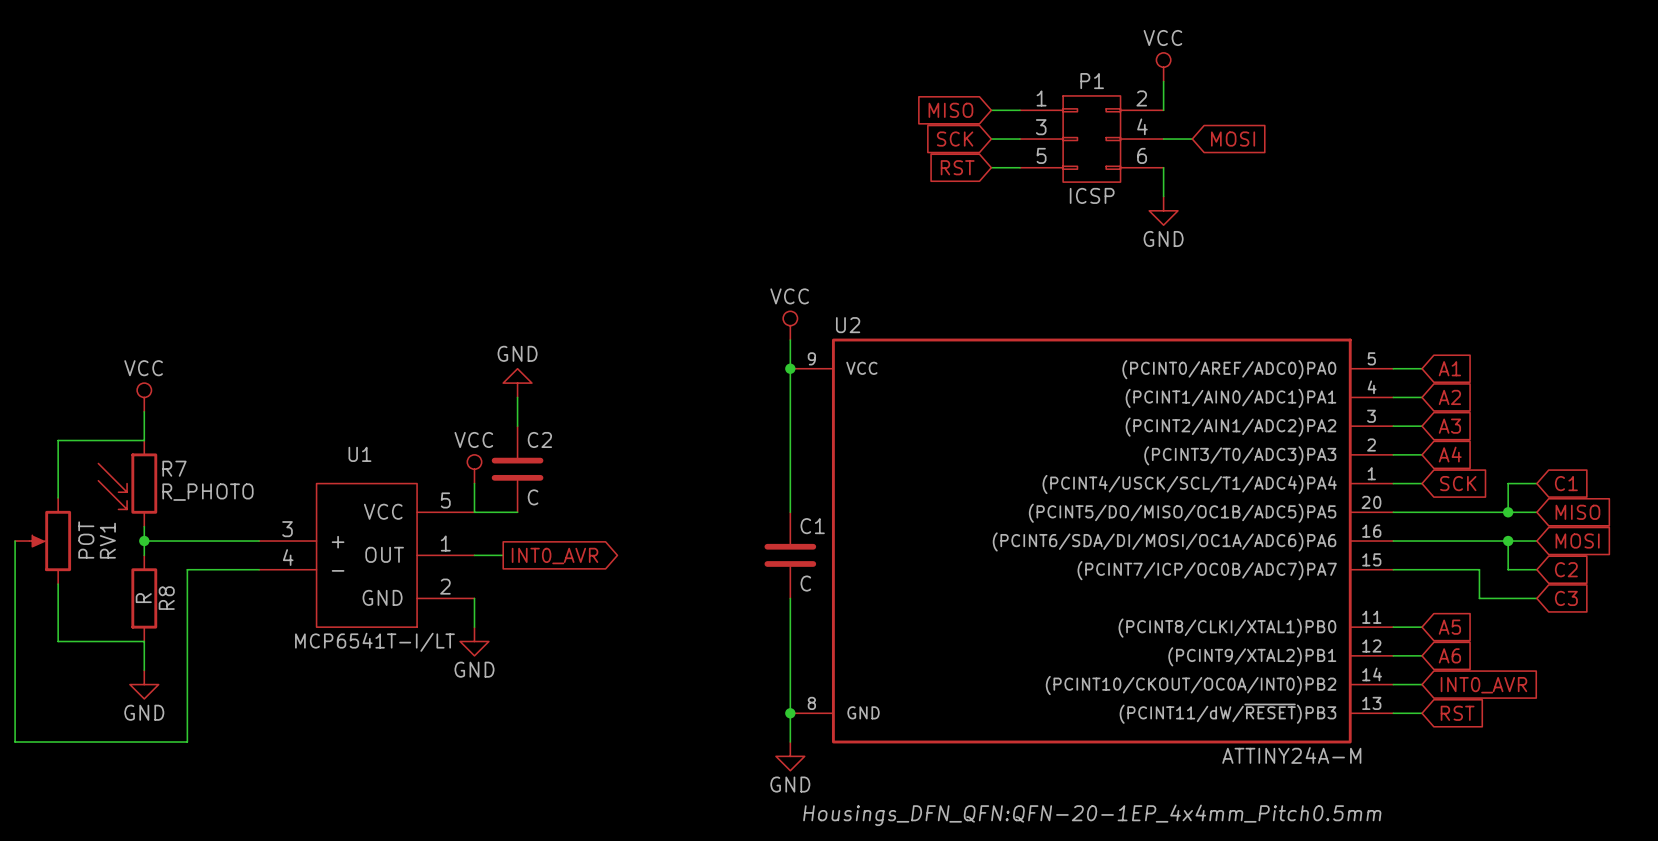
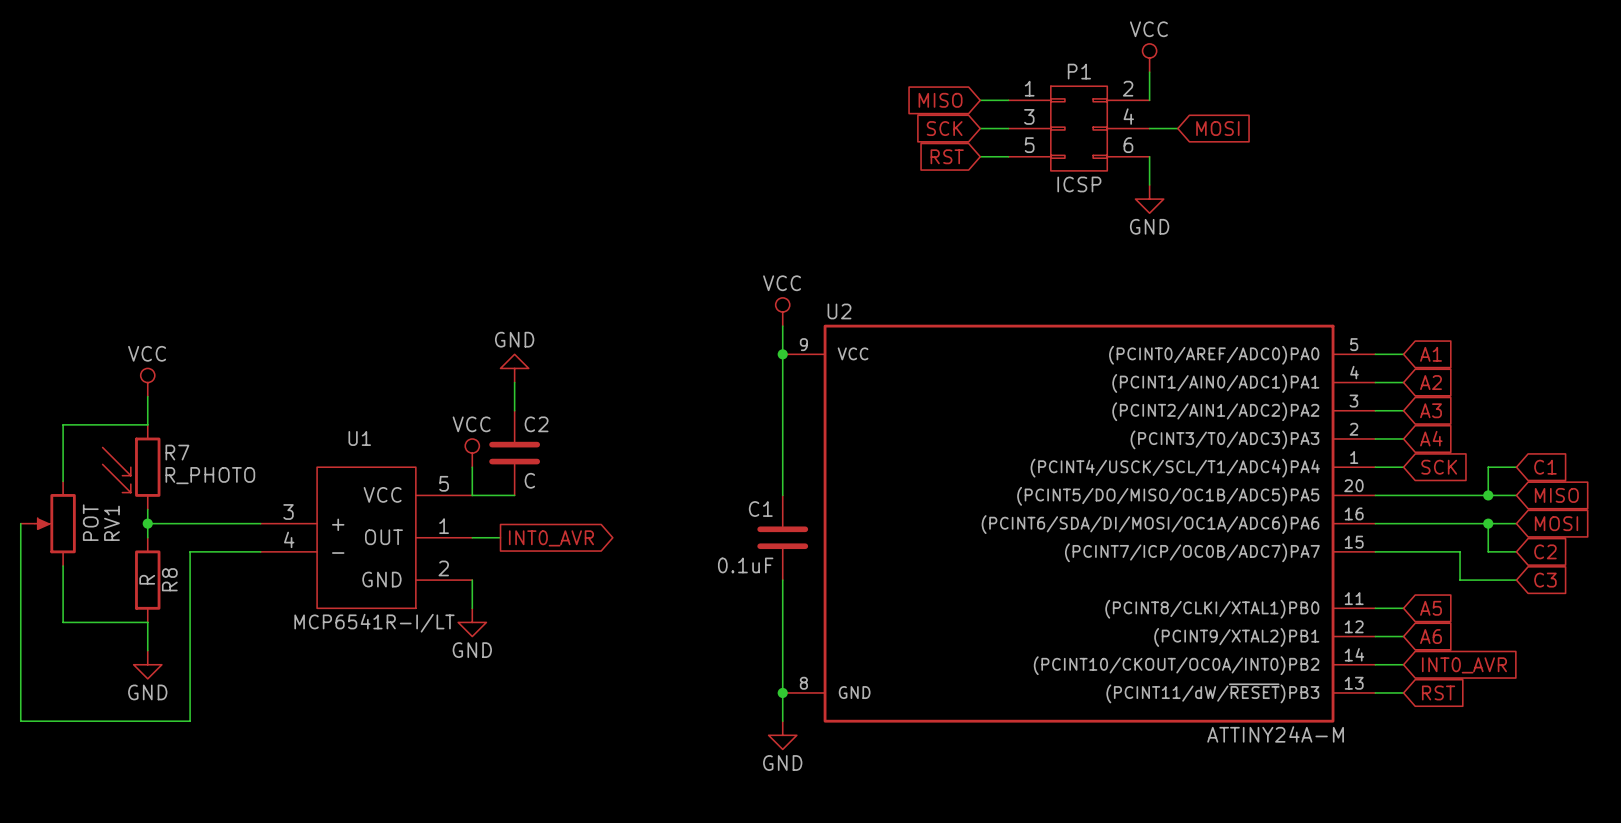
C1 name position: C1 (812, 526) -> C1 (760, 509)
C1 value: C (805, 583) -> 0.1uF (745, 565)
U1 value: MCP6541T-I/LT (374, 642) -> MCP6541R-I/LT (374, 623)
U2 text: Housings_DFN_QFN:QFN-20-1EP_4x4mm_Pitch0.5mm (1092, 815) -> none

